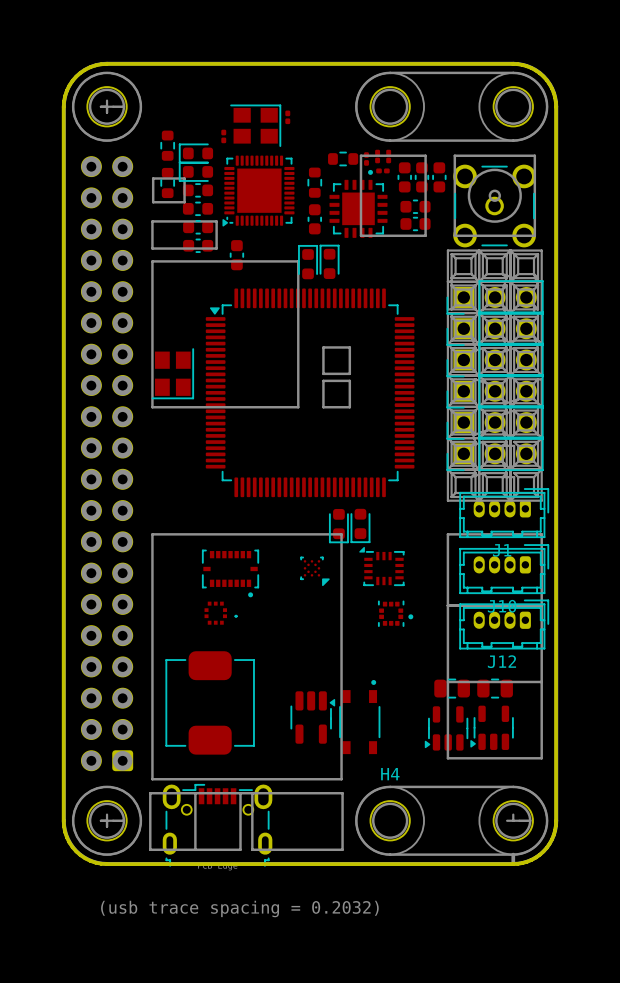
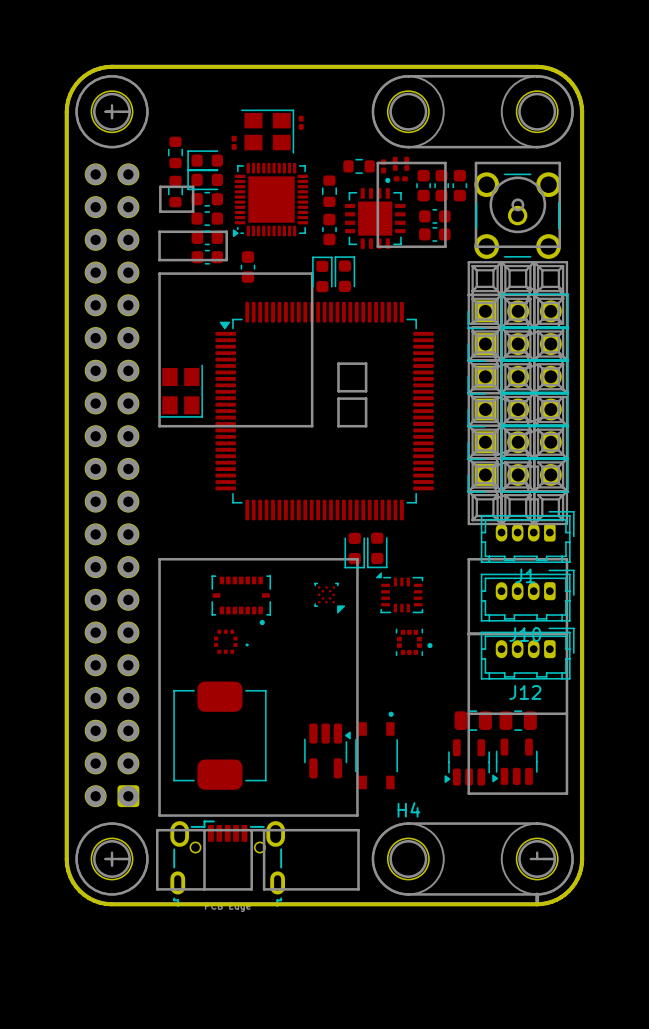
text: (usb trace spacing = 0.2032) (239, 908) -> none

